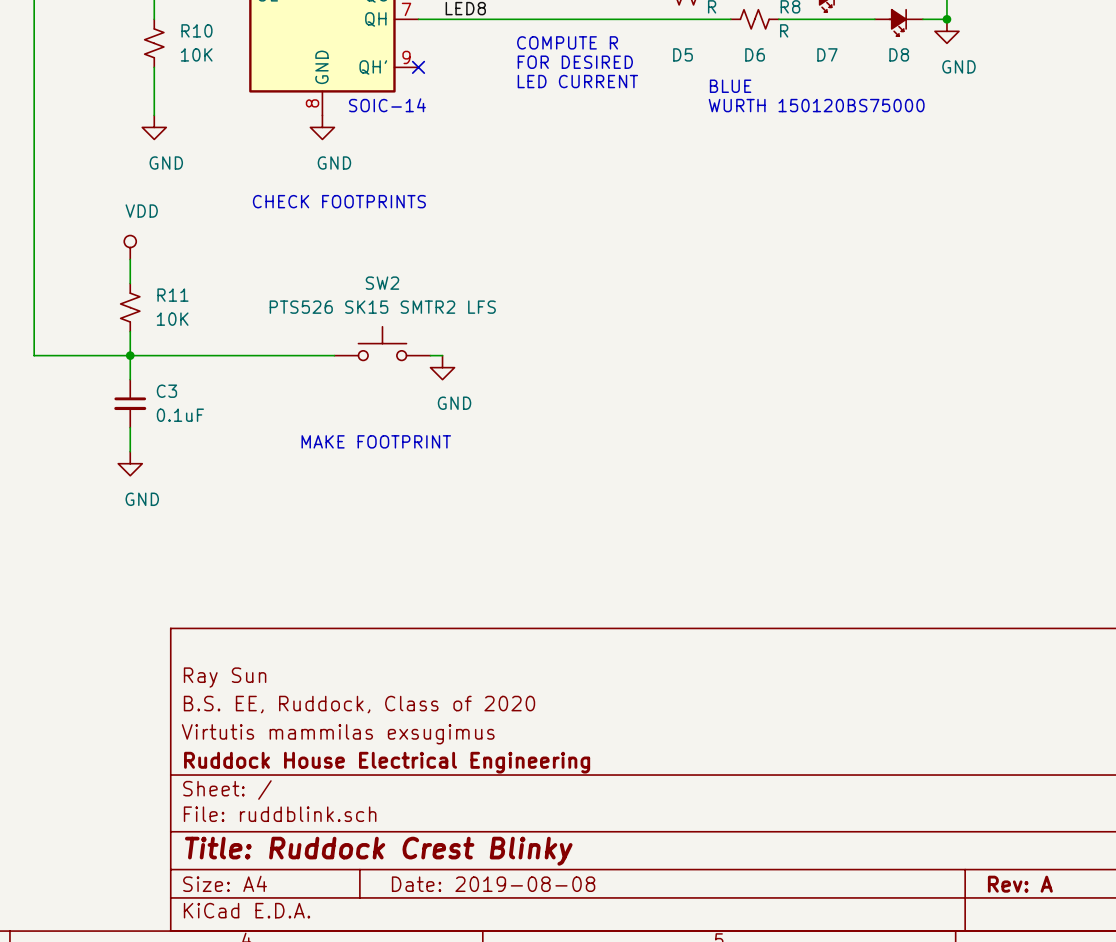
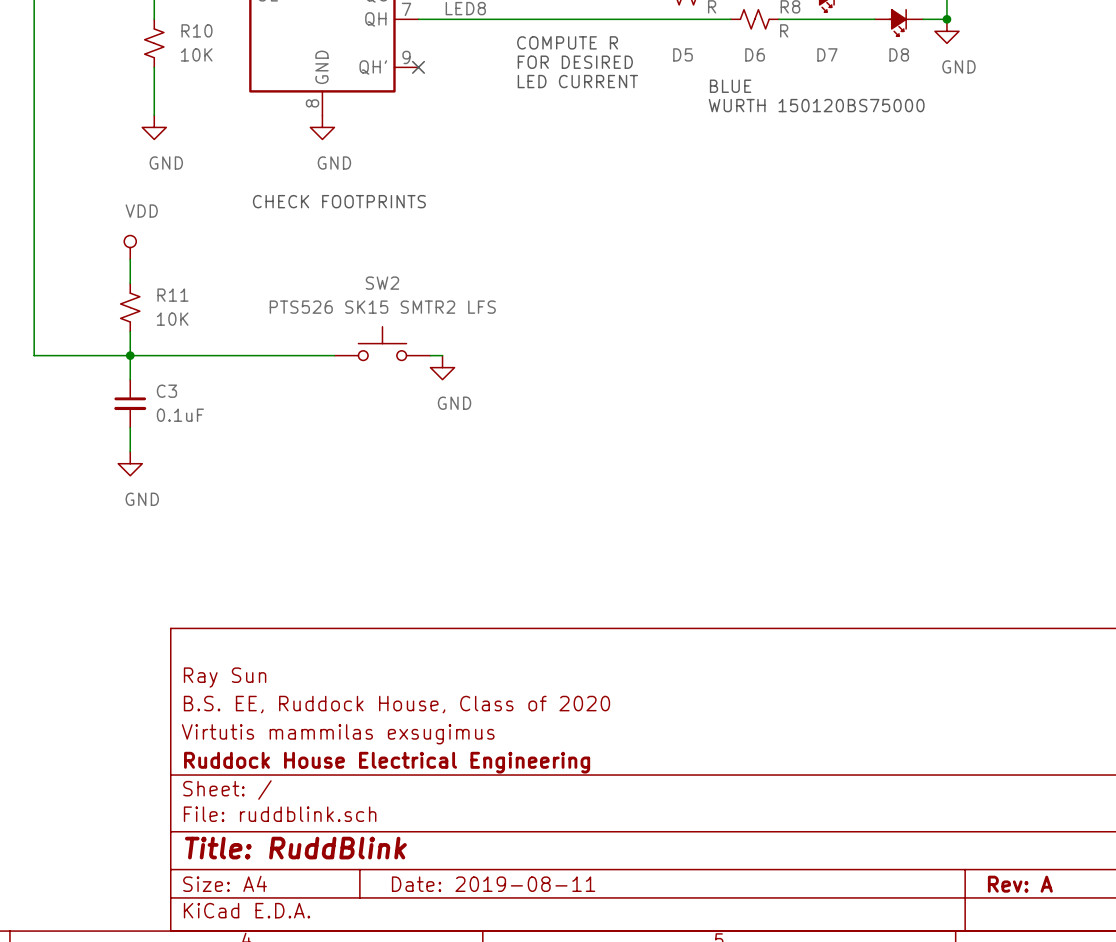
text: SOIC-14 (387, 105) -> none
text: MAKE FOOTPRINT (376, 441) -> none
title block: B.S. EE, Ruddock, Class of 2020 (359, 704) -> B.S. EE, Ruddock House, Class of 2020 (396, 704)
title block: Title: Ruddock Crest Blinky (378, 851) -> Title: RuddBlink (295, 848)
title block: Date: 2019-08-08 (493, 884) -> Date: 2019-08-11 (493, 884)

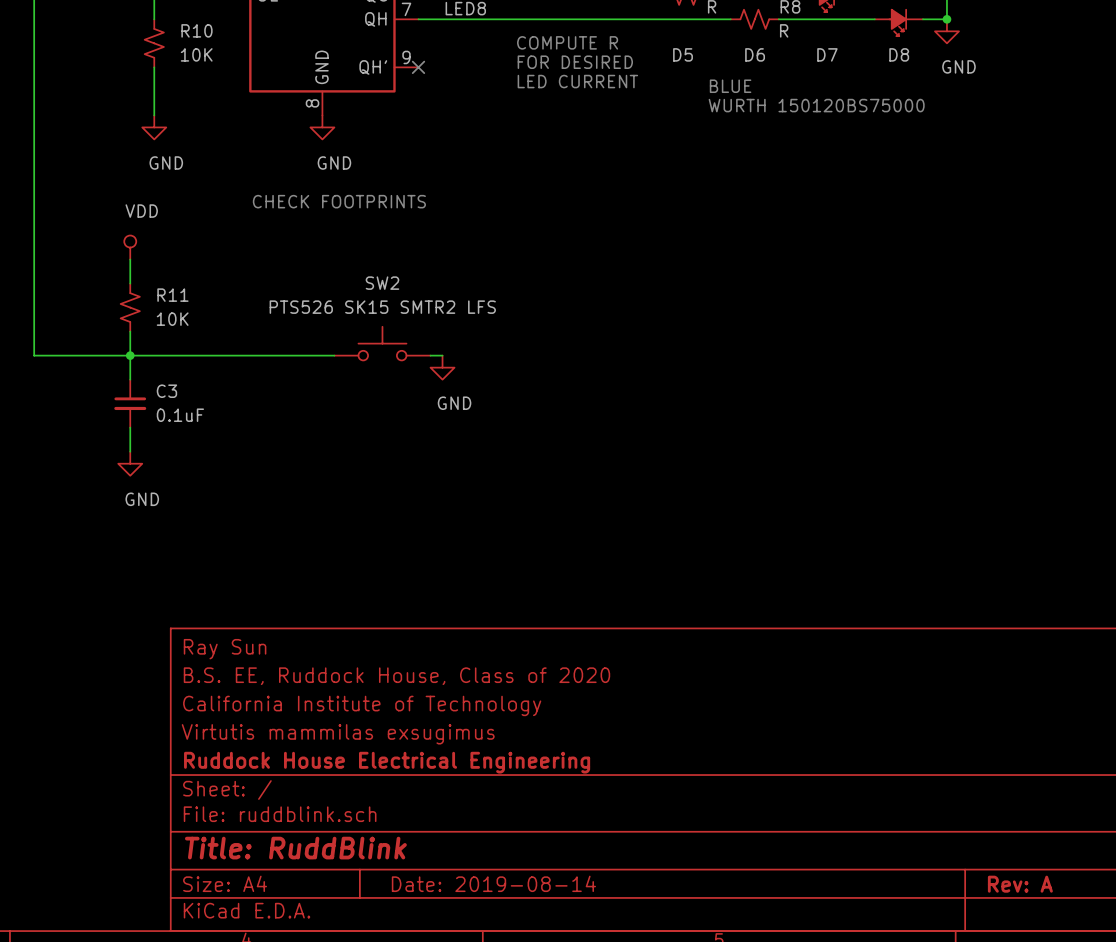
title block: none -> Ray Sun (225, 649)
title block: Ray Sun (225, 677) -> B.S. EE, Ruddock House, Class of 2020 (396, 676)
title block: B.S. EE, Ruddock House, Class of 2020 (396, 704) -> California Institute of Technology (362, 705)
title block: Date: 2019-08-11 (493, 884) -> Date: 2019-08-14 (493, 883)

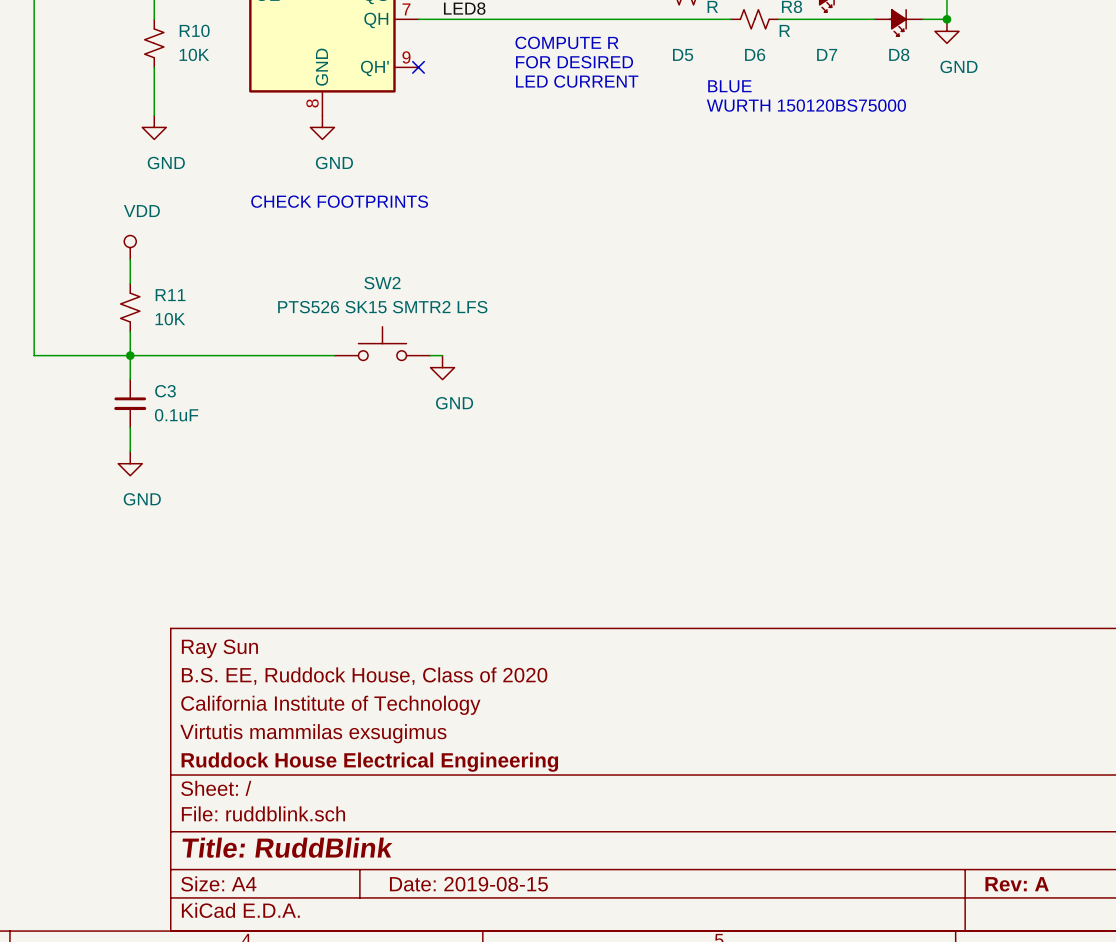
title block: Date: 2019-08-14 (493, 883) -> Date: 2019-08-15 (468, 884)

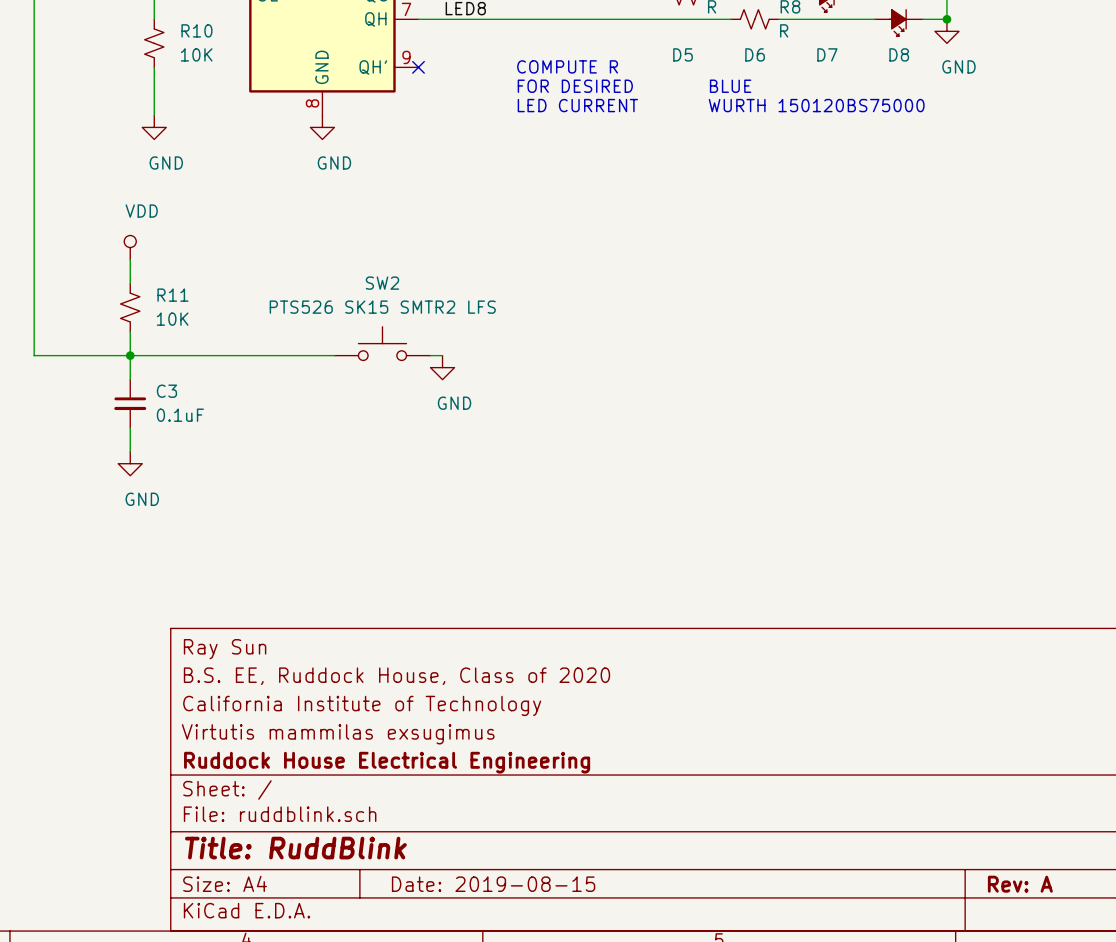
text position: COMPUTE R (567, 42) -> COMPUTE R (567, 66)
text position: FOR DESIRED (574, 62) -> FOR DESIRED (575, 86)
text position: LED CURRENT (577, 81) -> LED CURRENT (577, 105)
text: CHECK FOOTPRINTS (339, 201) -> none

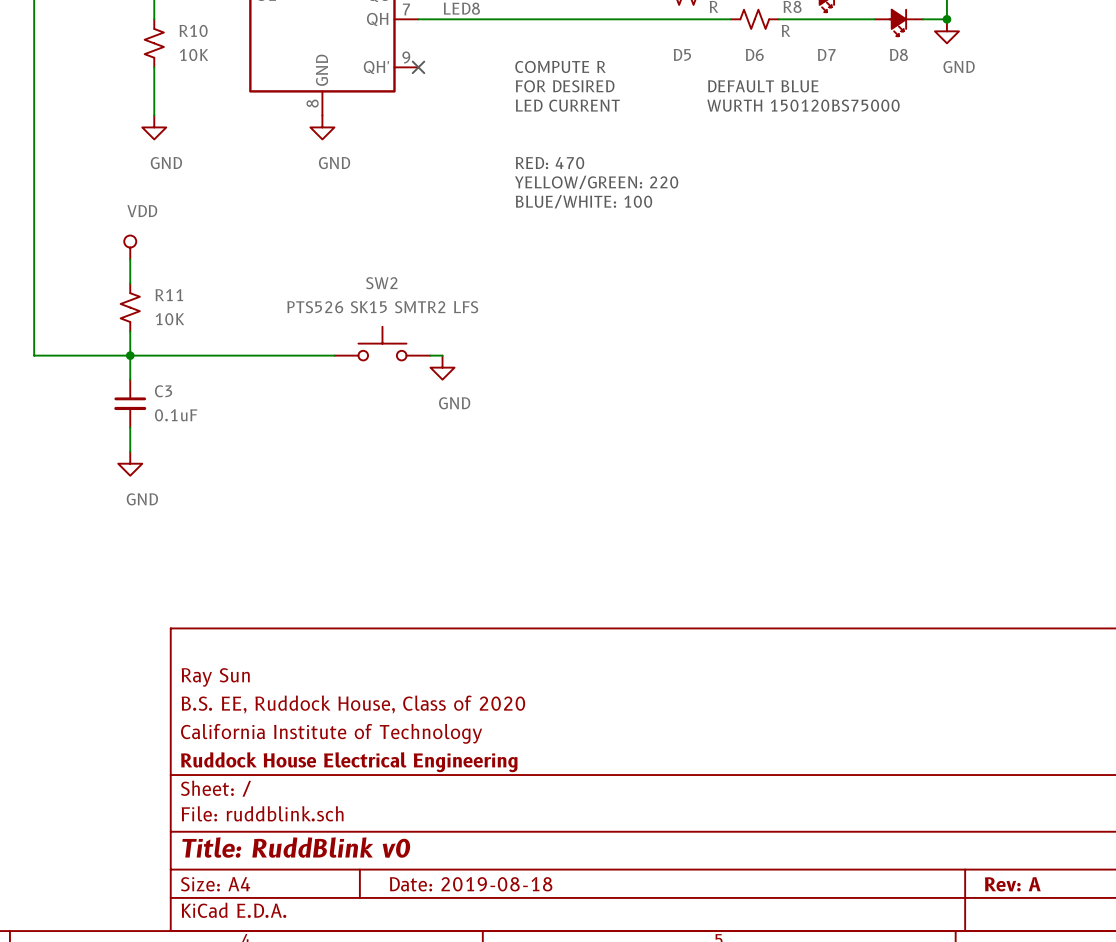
text: BLUE (730, 86) -> DEFAULT BLUE (763, 86)
text: none -> RED: 470 (550, 163)
text: none -> YELLOW/GREEN: 220 (596, 182)
text: none -> BLUE/WHITE: 100 (584, 201)
title block: Ray Sun (225, 649) -> none
title block: B.S. EE, Ruddock House, Class of 2020 (396, 676) -> Ray Sun (215, 677)
title block: California Institute of Technology (362, 705) -> B.S. EE, Ruddock House, Class of 2020 (353, 704)
title block: Virtutis mammilas exsugimus (338, 734) -> California Institute of Technology (331, 733)
title block: Title: RuddBlink (295, 848) -> Title: RuddBlink v0 (296, 847)
title block: Date: 2019-08-15 (493, 884) -> Date: 2019-08-18 (471, 884)

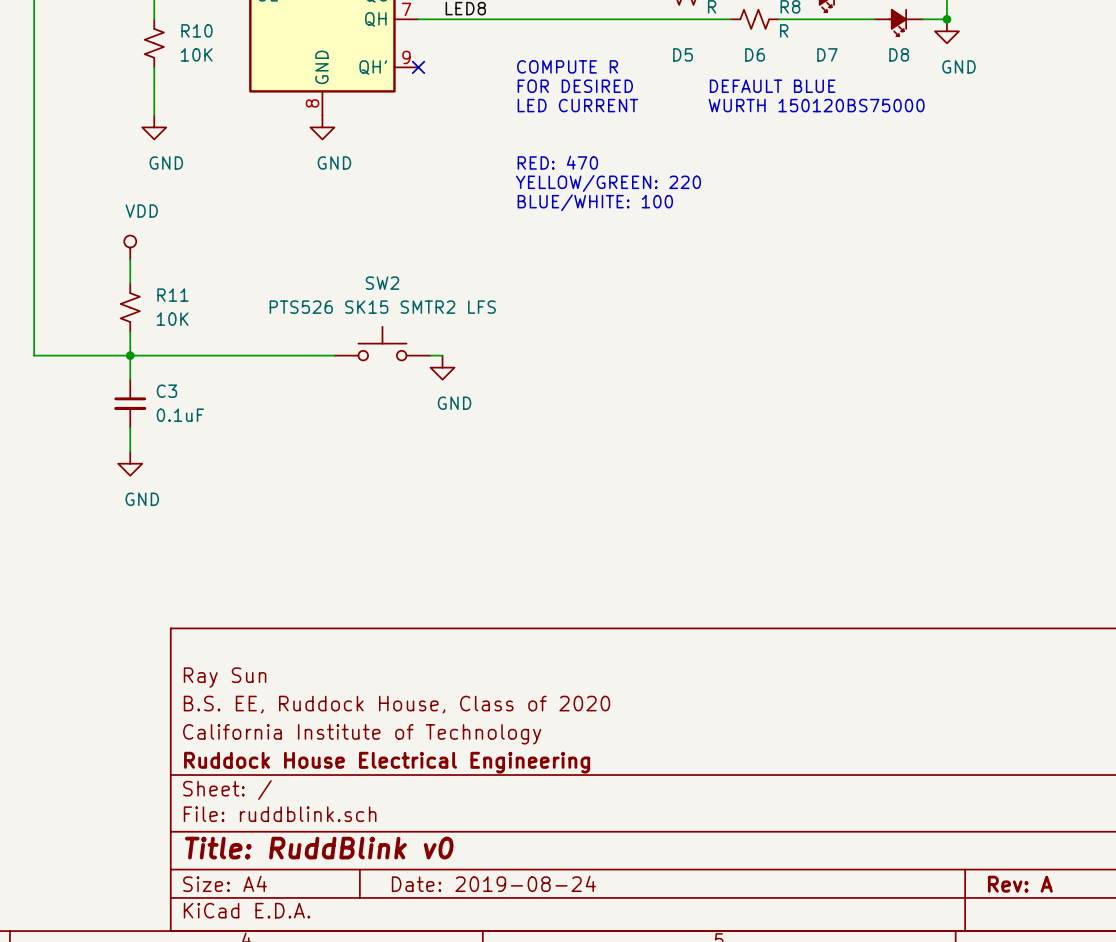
title block: Date: 2019-08-18 (471, 884) -> Date: 2019-08-24 (493, 883)

